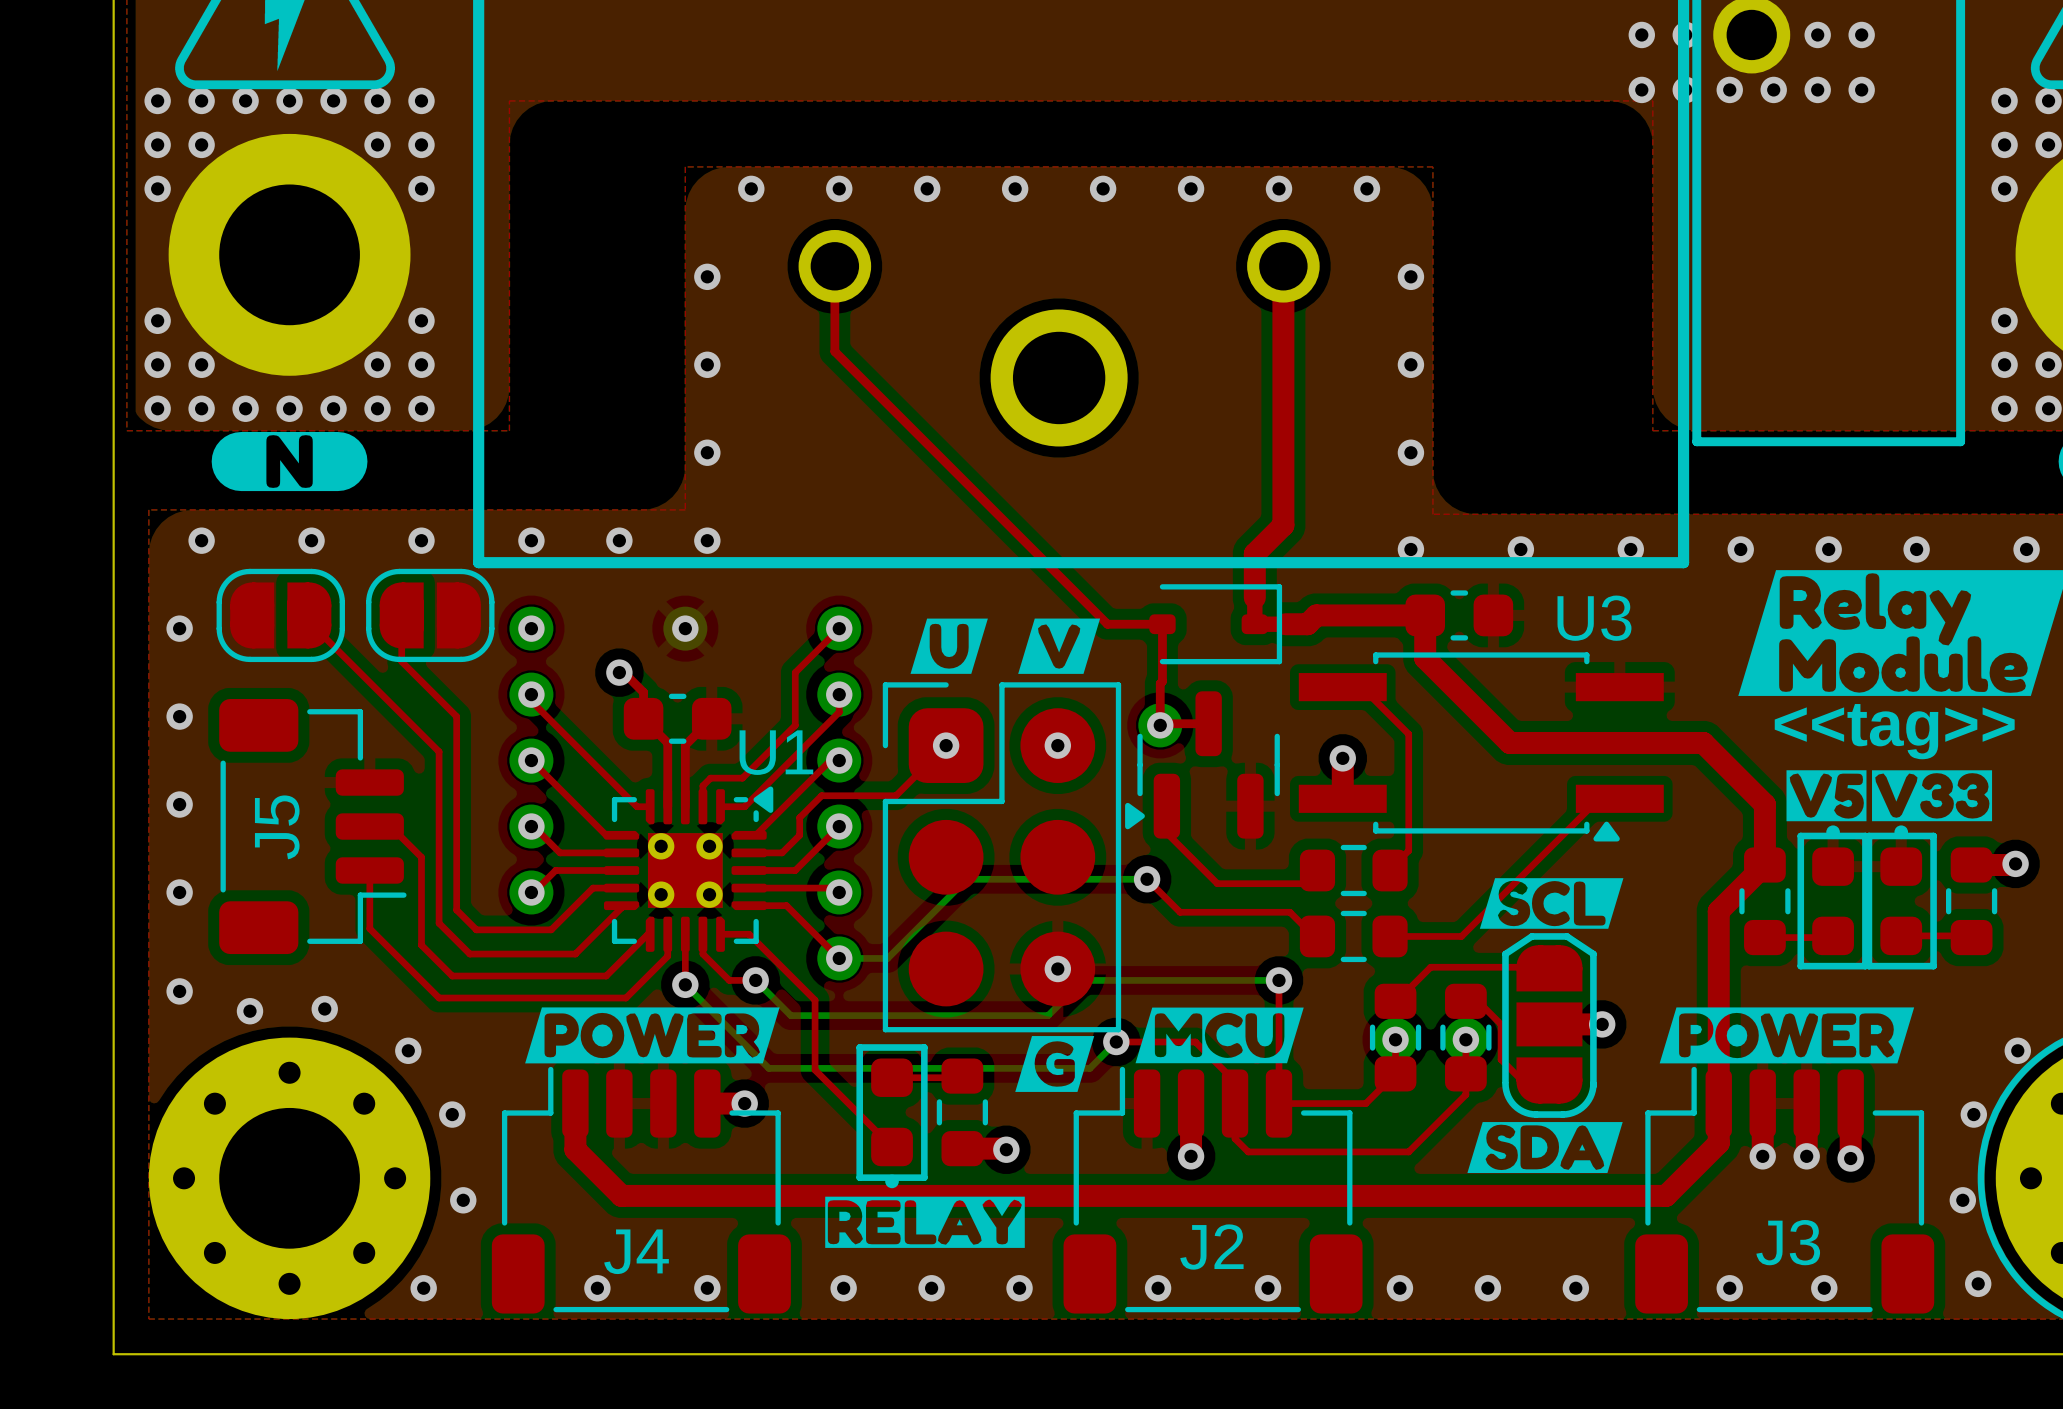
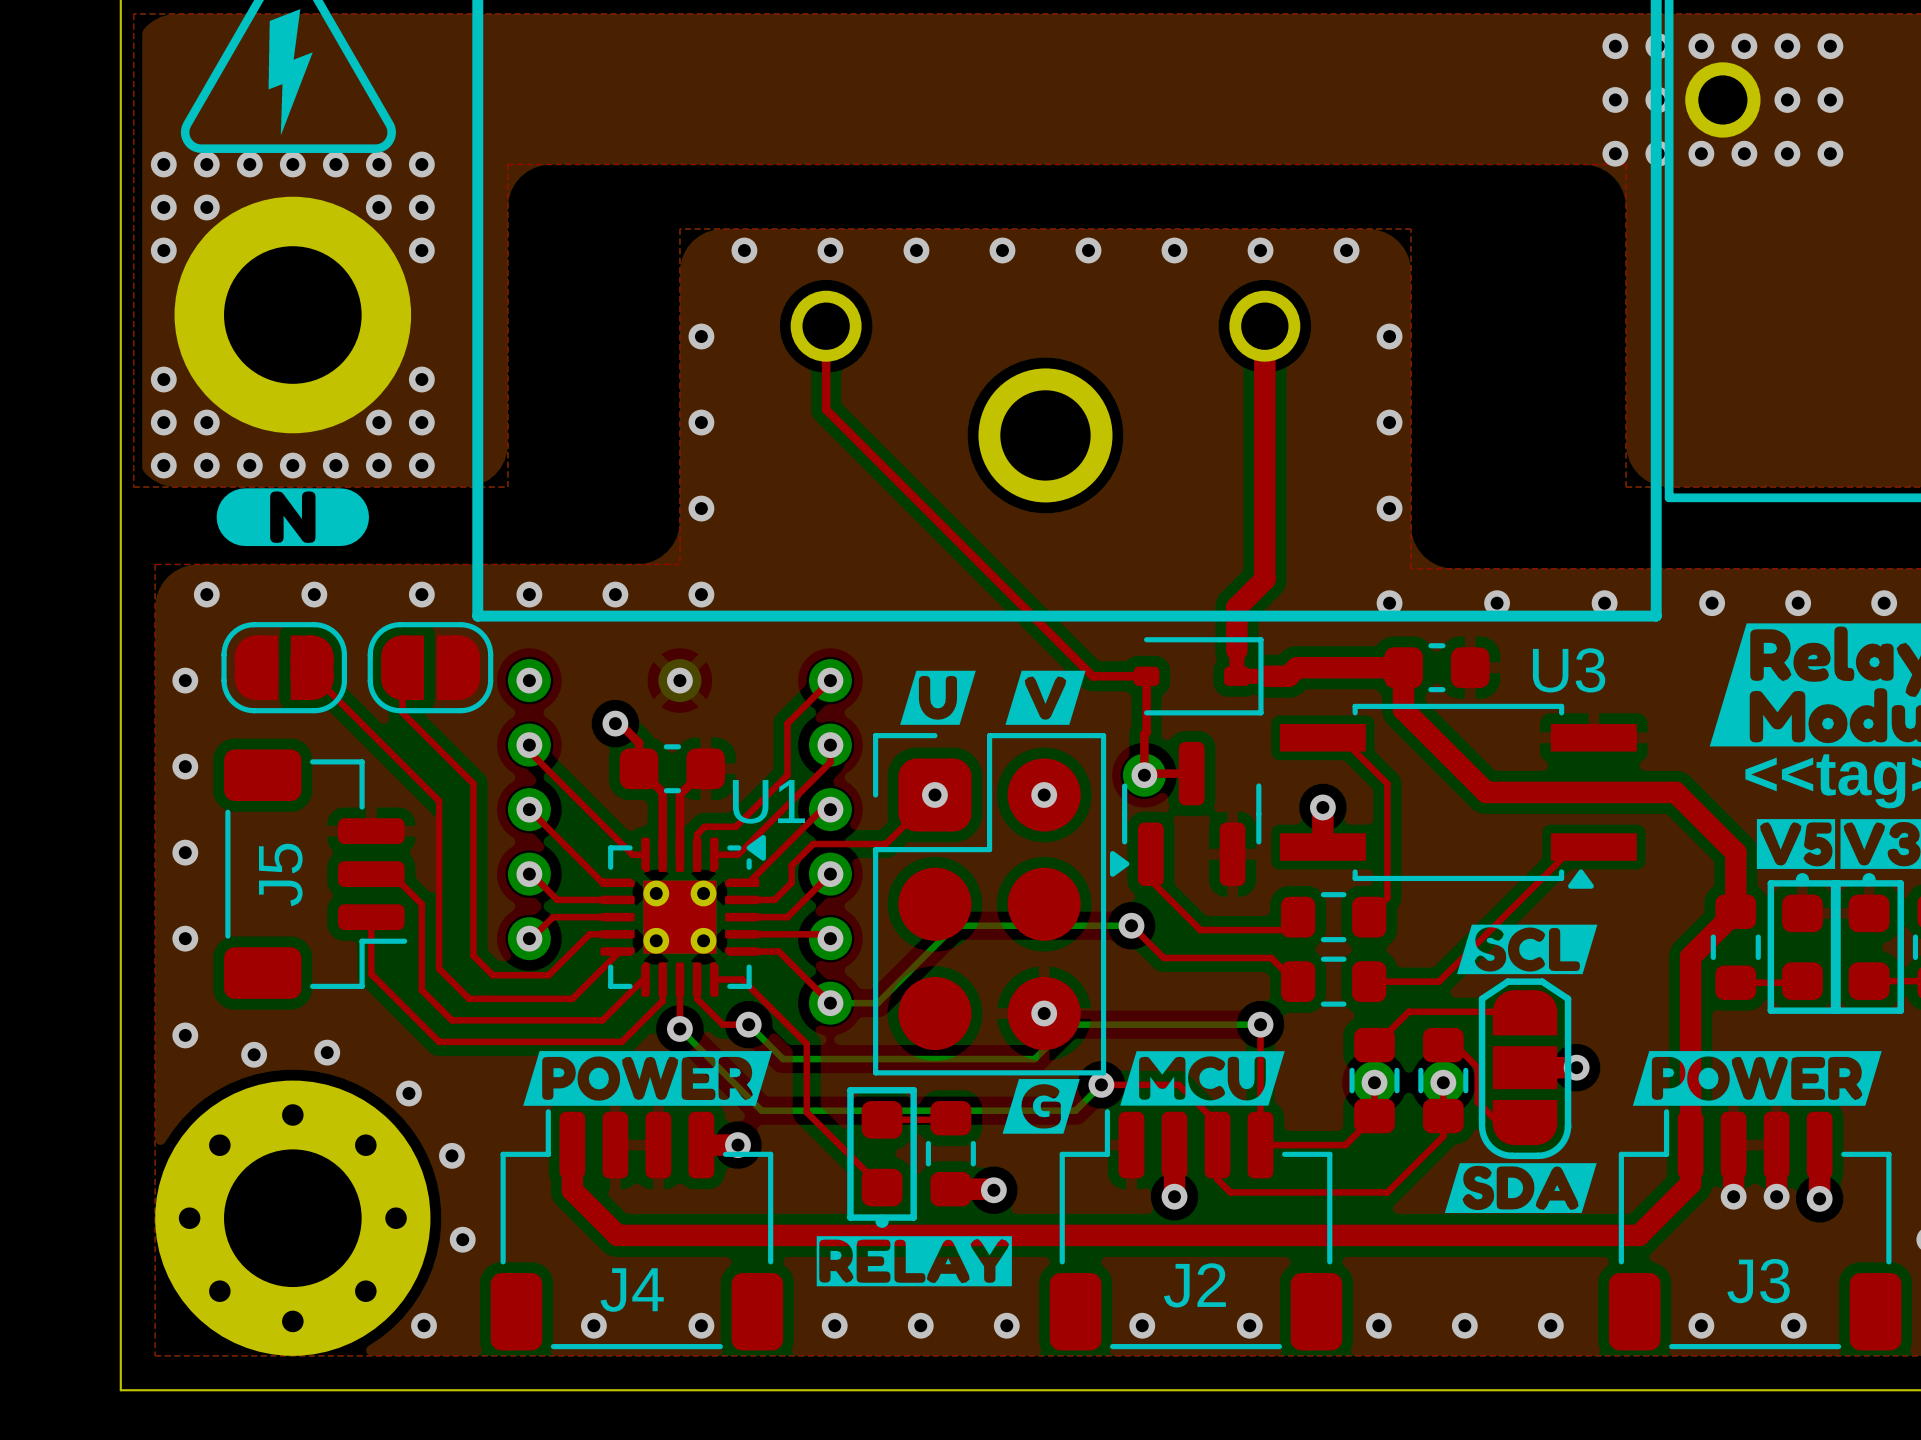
top track: (456, 716) (456, 910) (476, 929) (494, 929) -> (456, 766) (473, 783) (473, 955) (492, 975)

